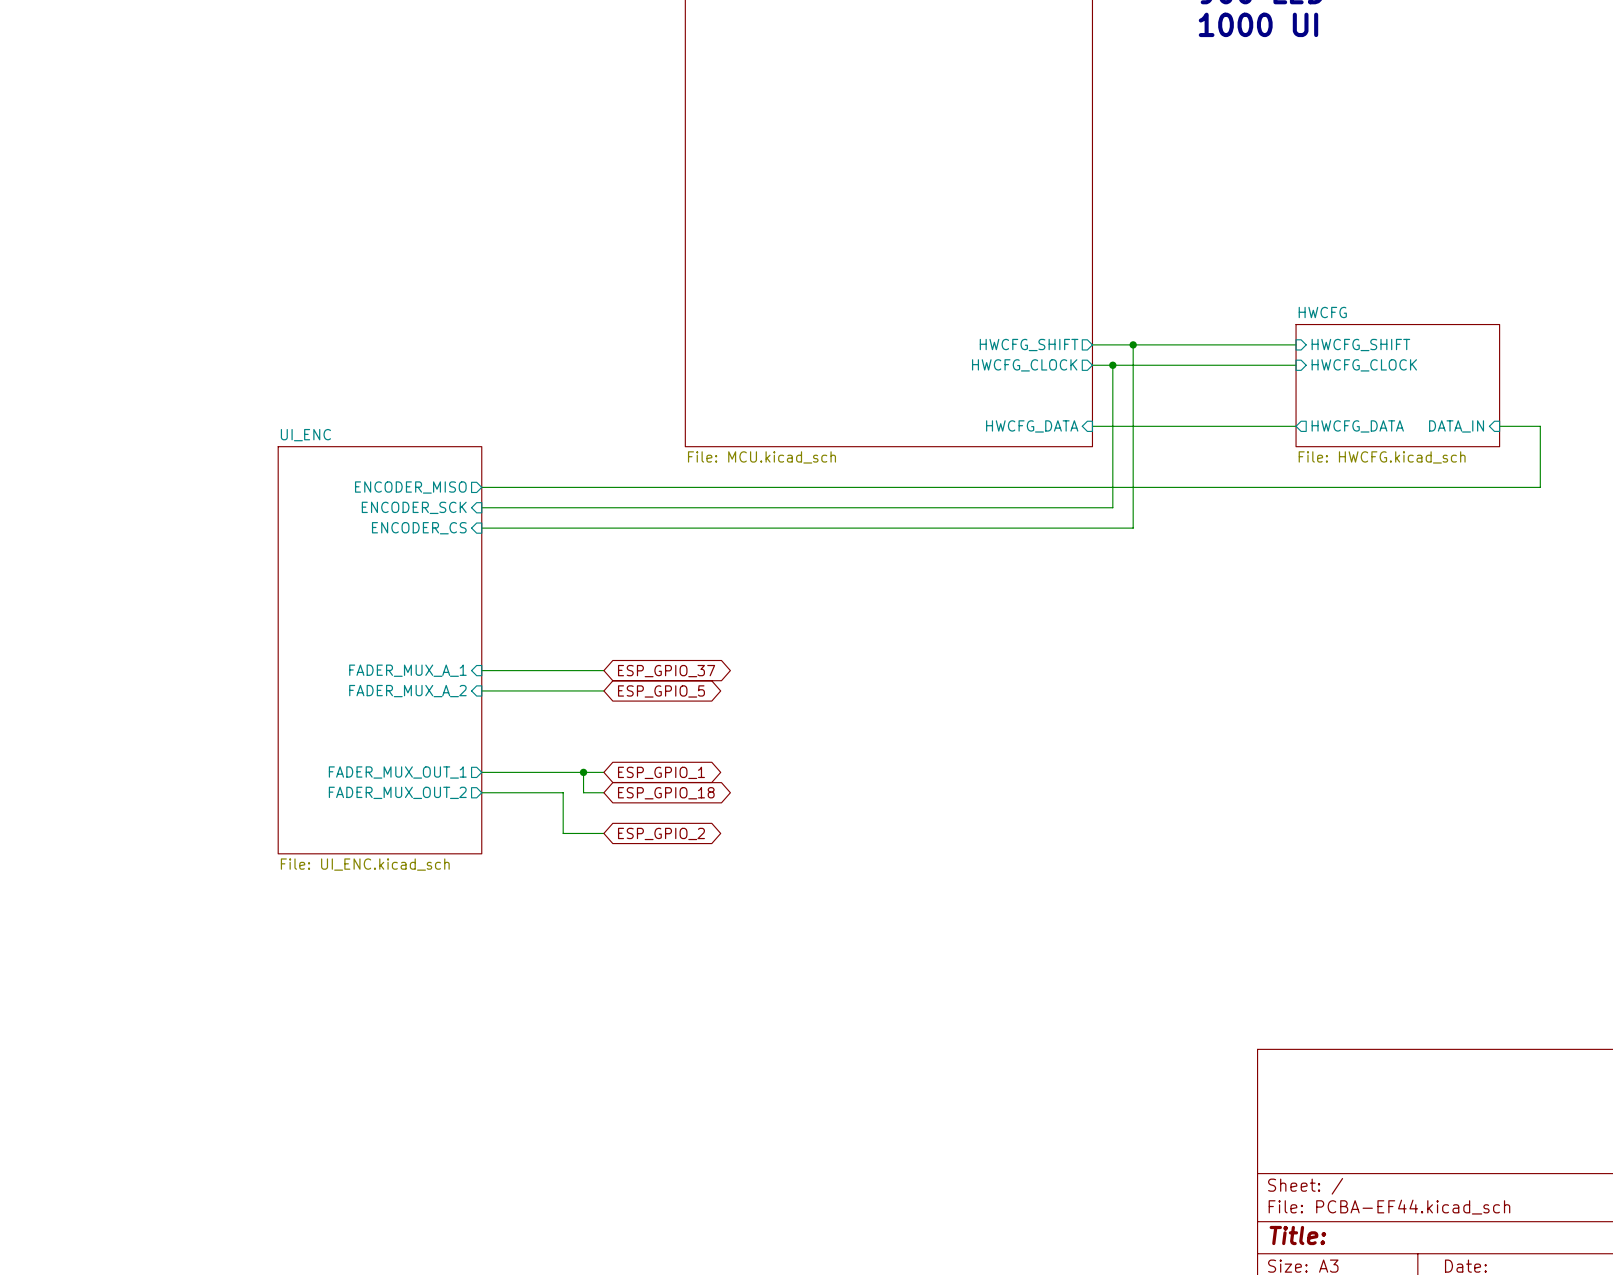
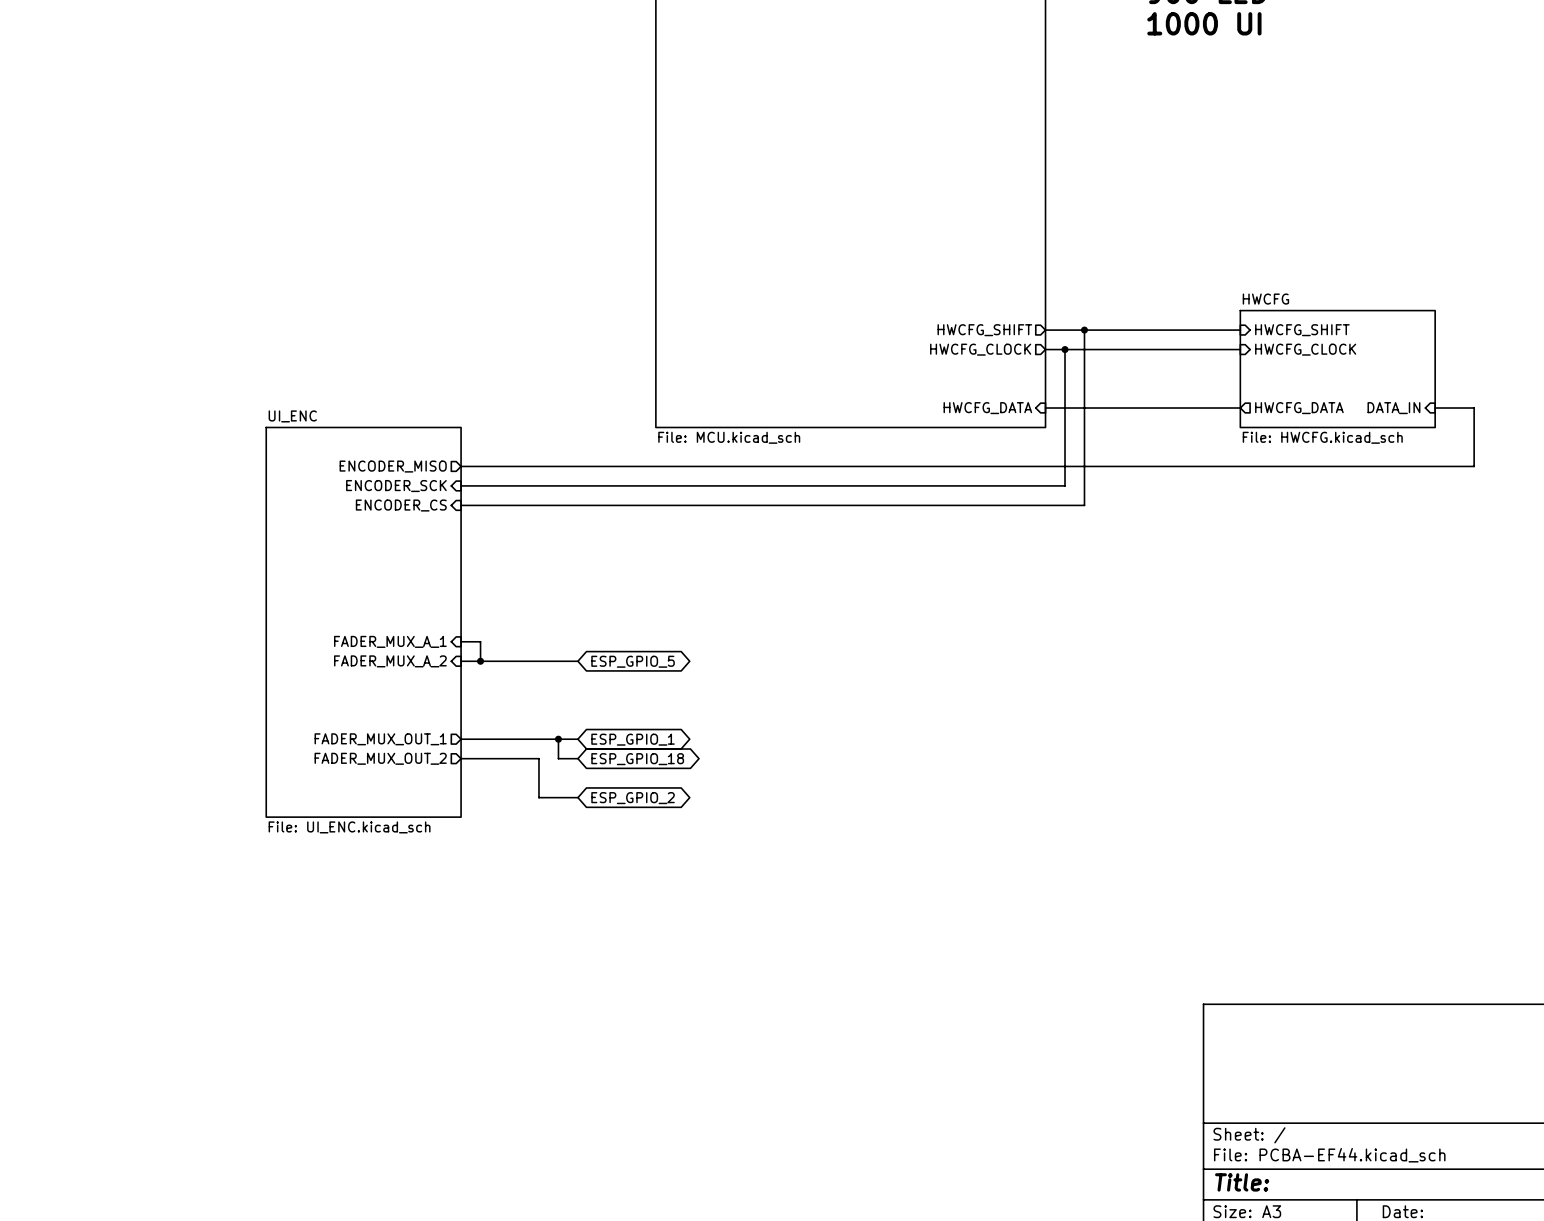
wire: (502, 670) (603, 670) -> (480, 641) (480, 661)
global label: ESP_GPIO_37 (666, 671) -> none
junction: none -> (480, 661)

